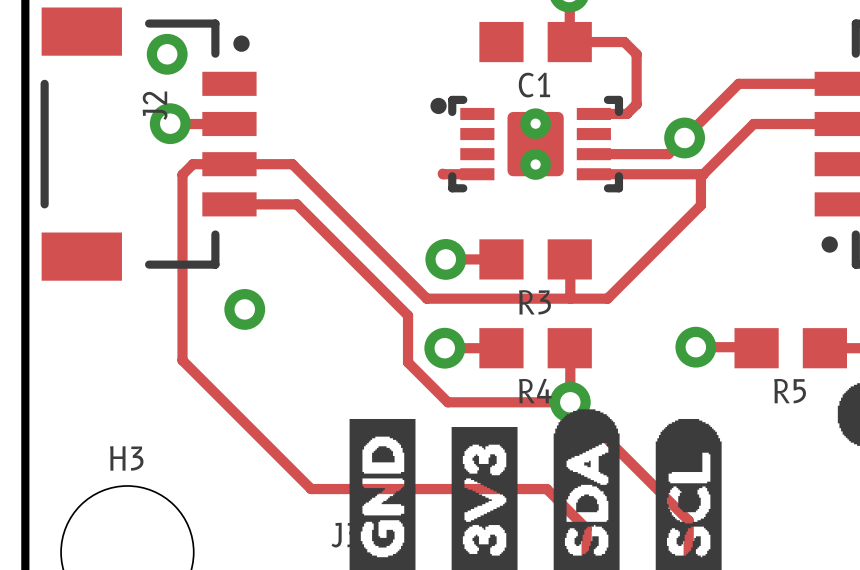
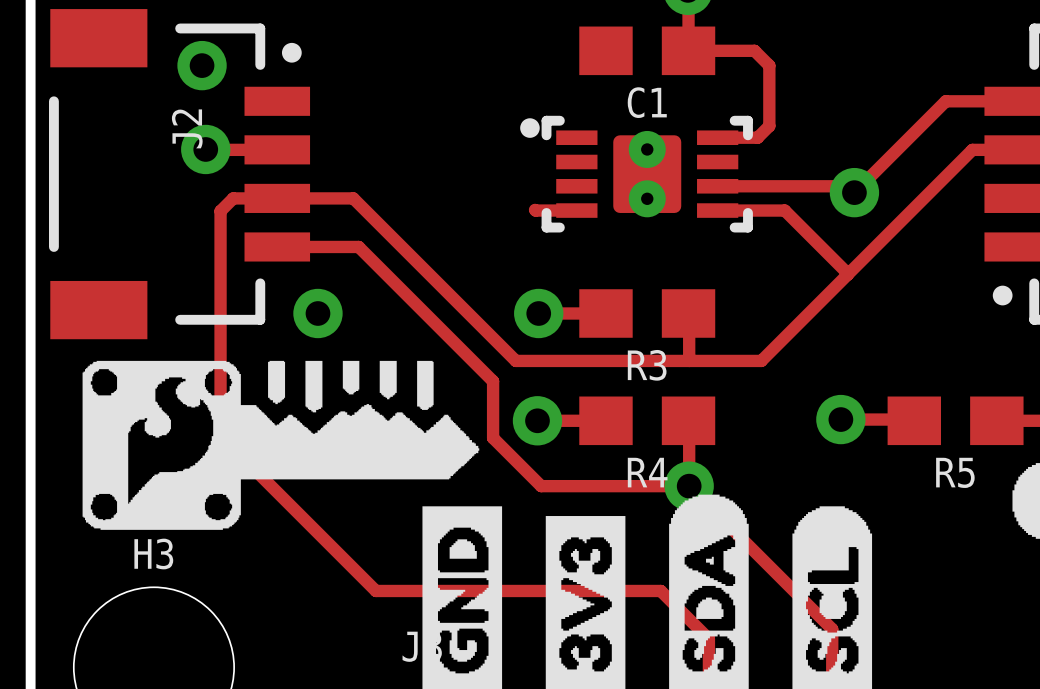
track: (782, 83) (738, 83) (668, 154) -> (945, 101) (854, 192) (848, 186) (807, 186)
track: (804, 124) (753, 124) (700, 174) (700, 205) (607, 298) -> (972, 149) (761, 360) (734, 360)
via position: (684, 137) -> (854, 192)
track: (649, 174) (703, 174) -> (784, 210) (847, 274)
drawing: none -> [82, 360, 480, 530]
via position: (244, 309) -> (317, 313)

